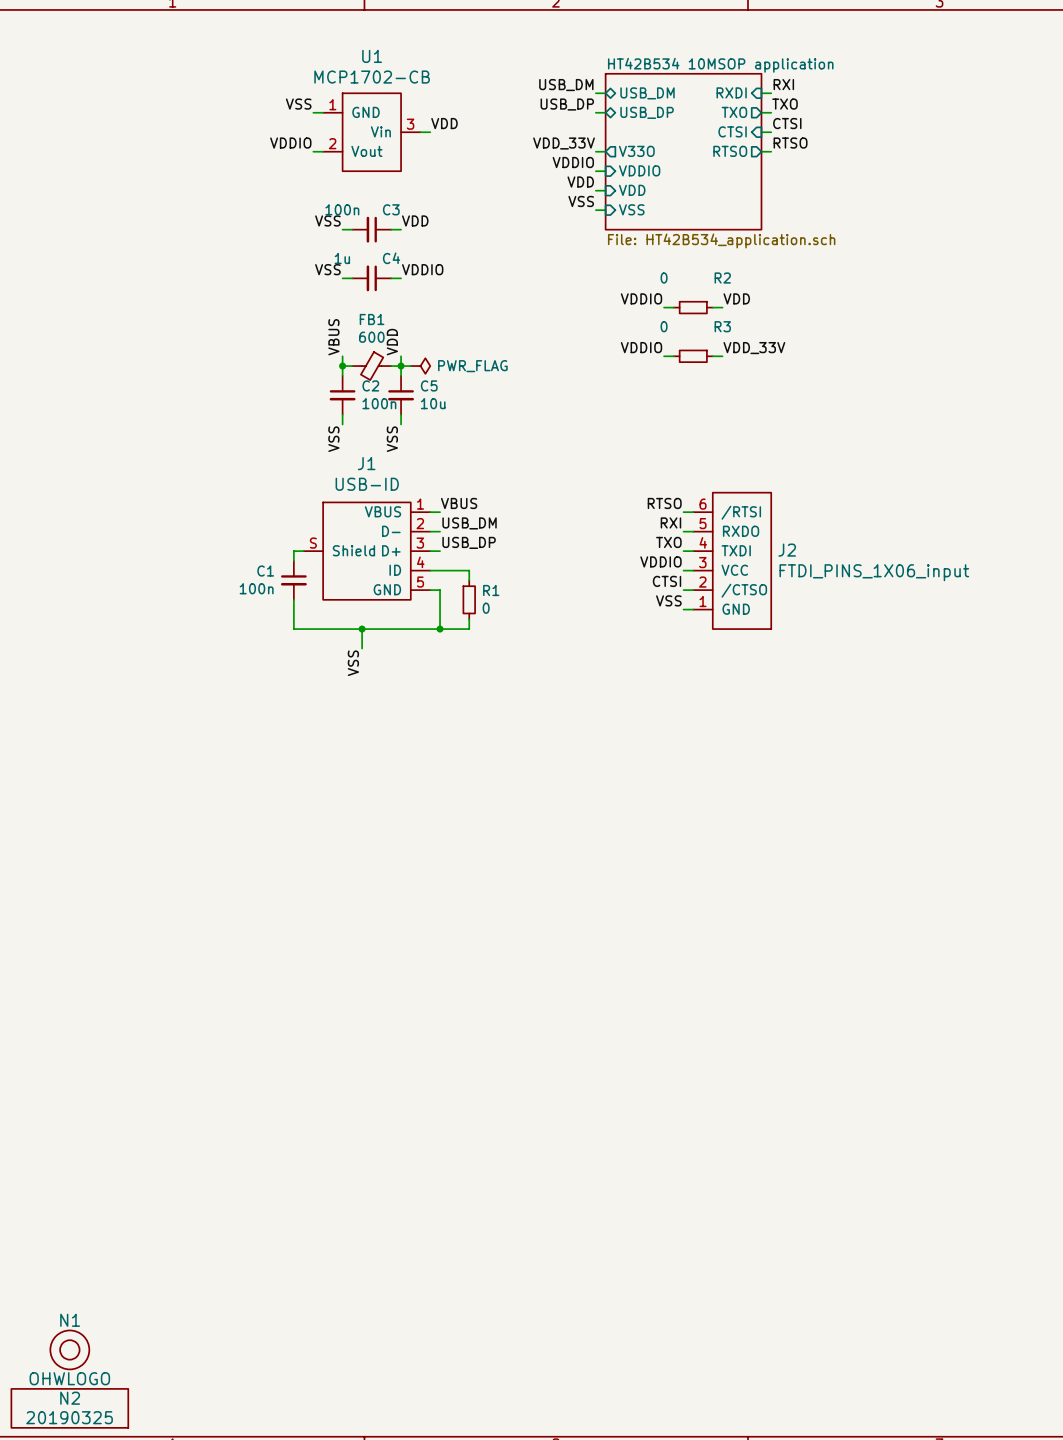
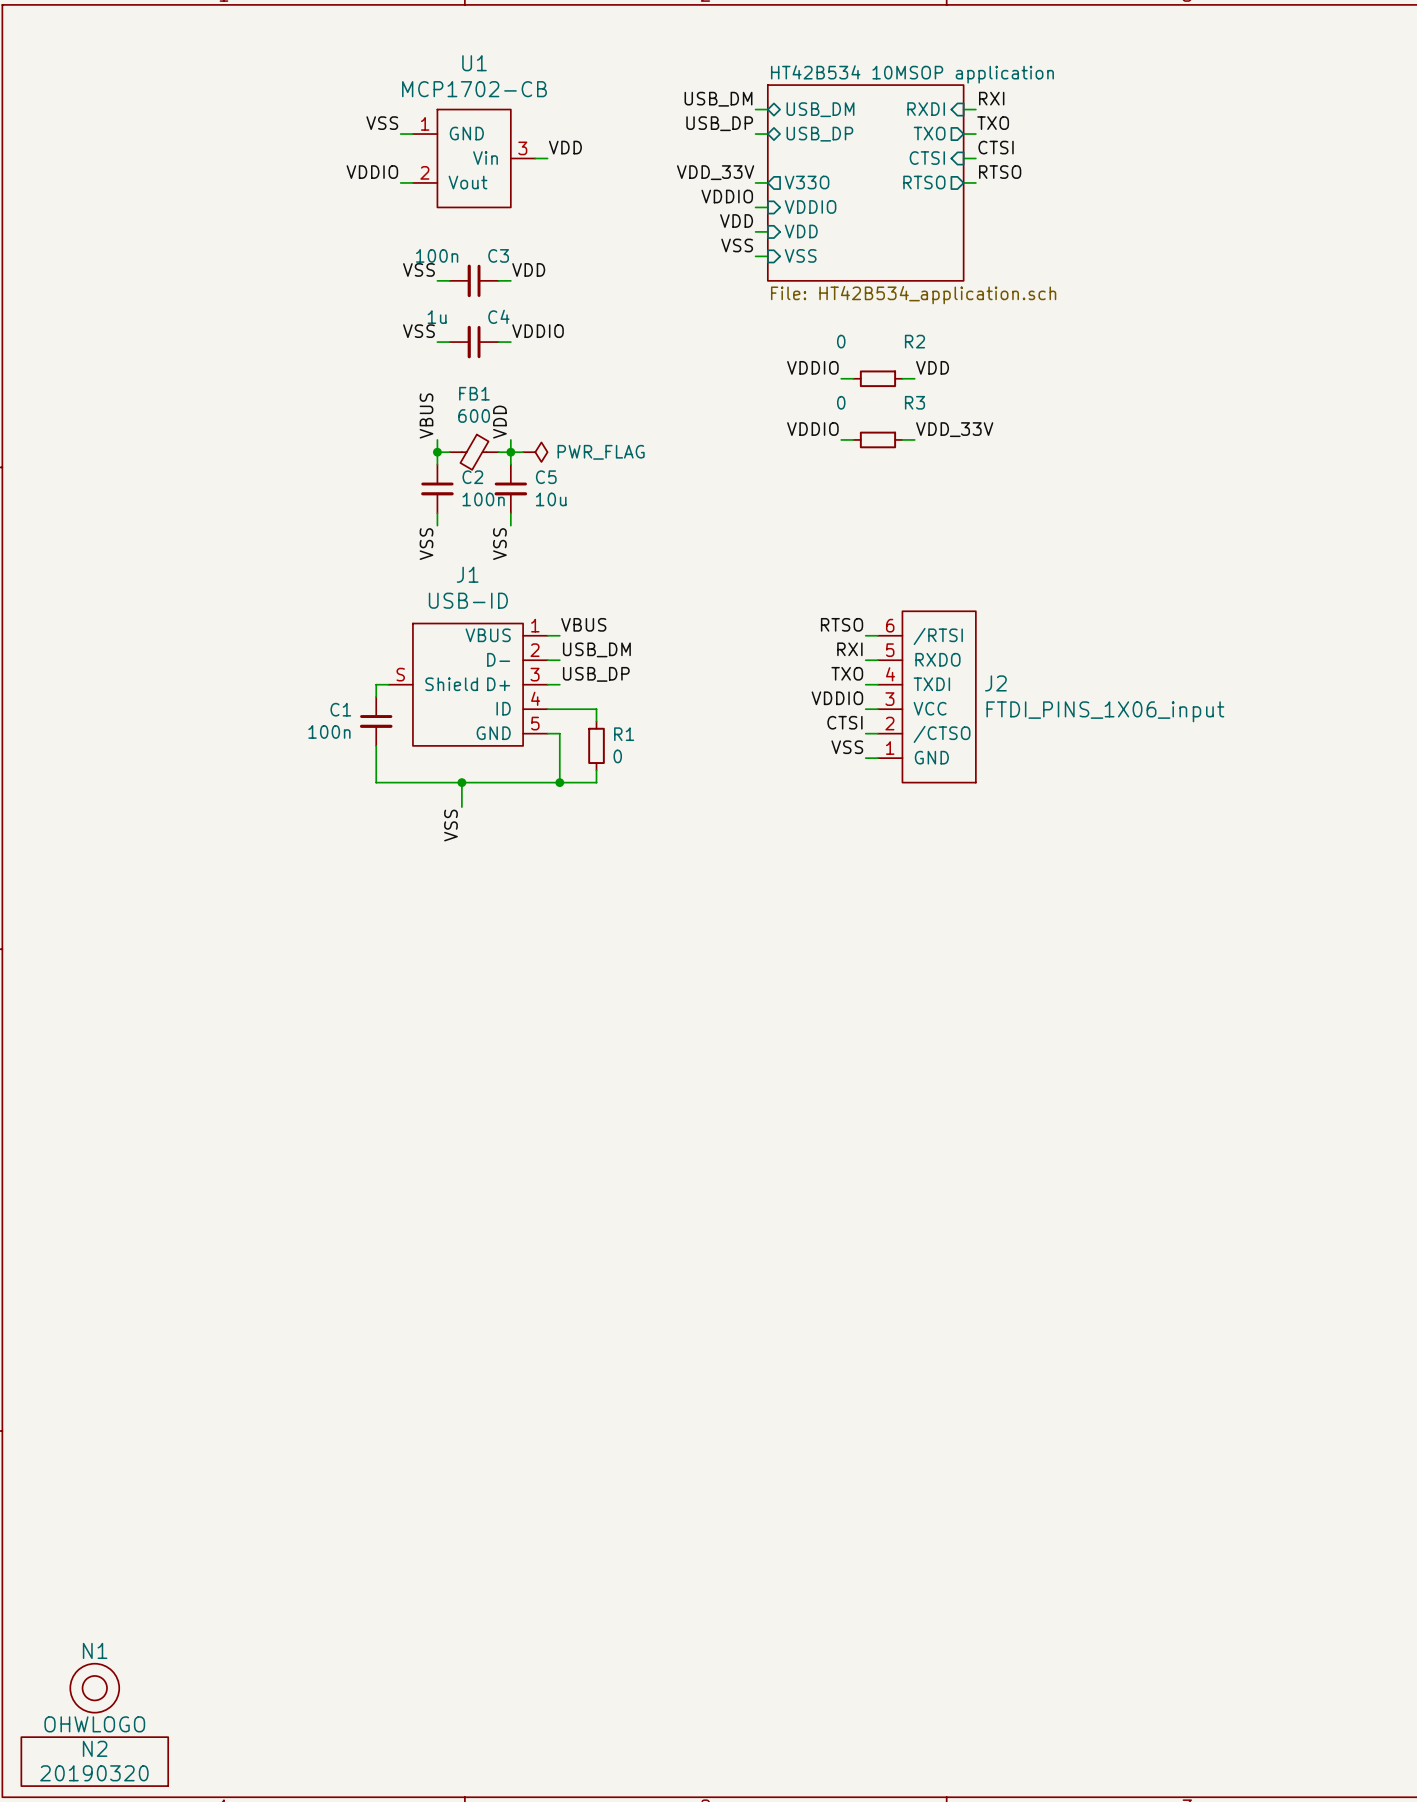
N2 value: 20190325 (69, 1417) -> 20190320 (94, 1773)

